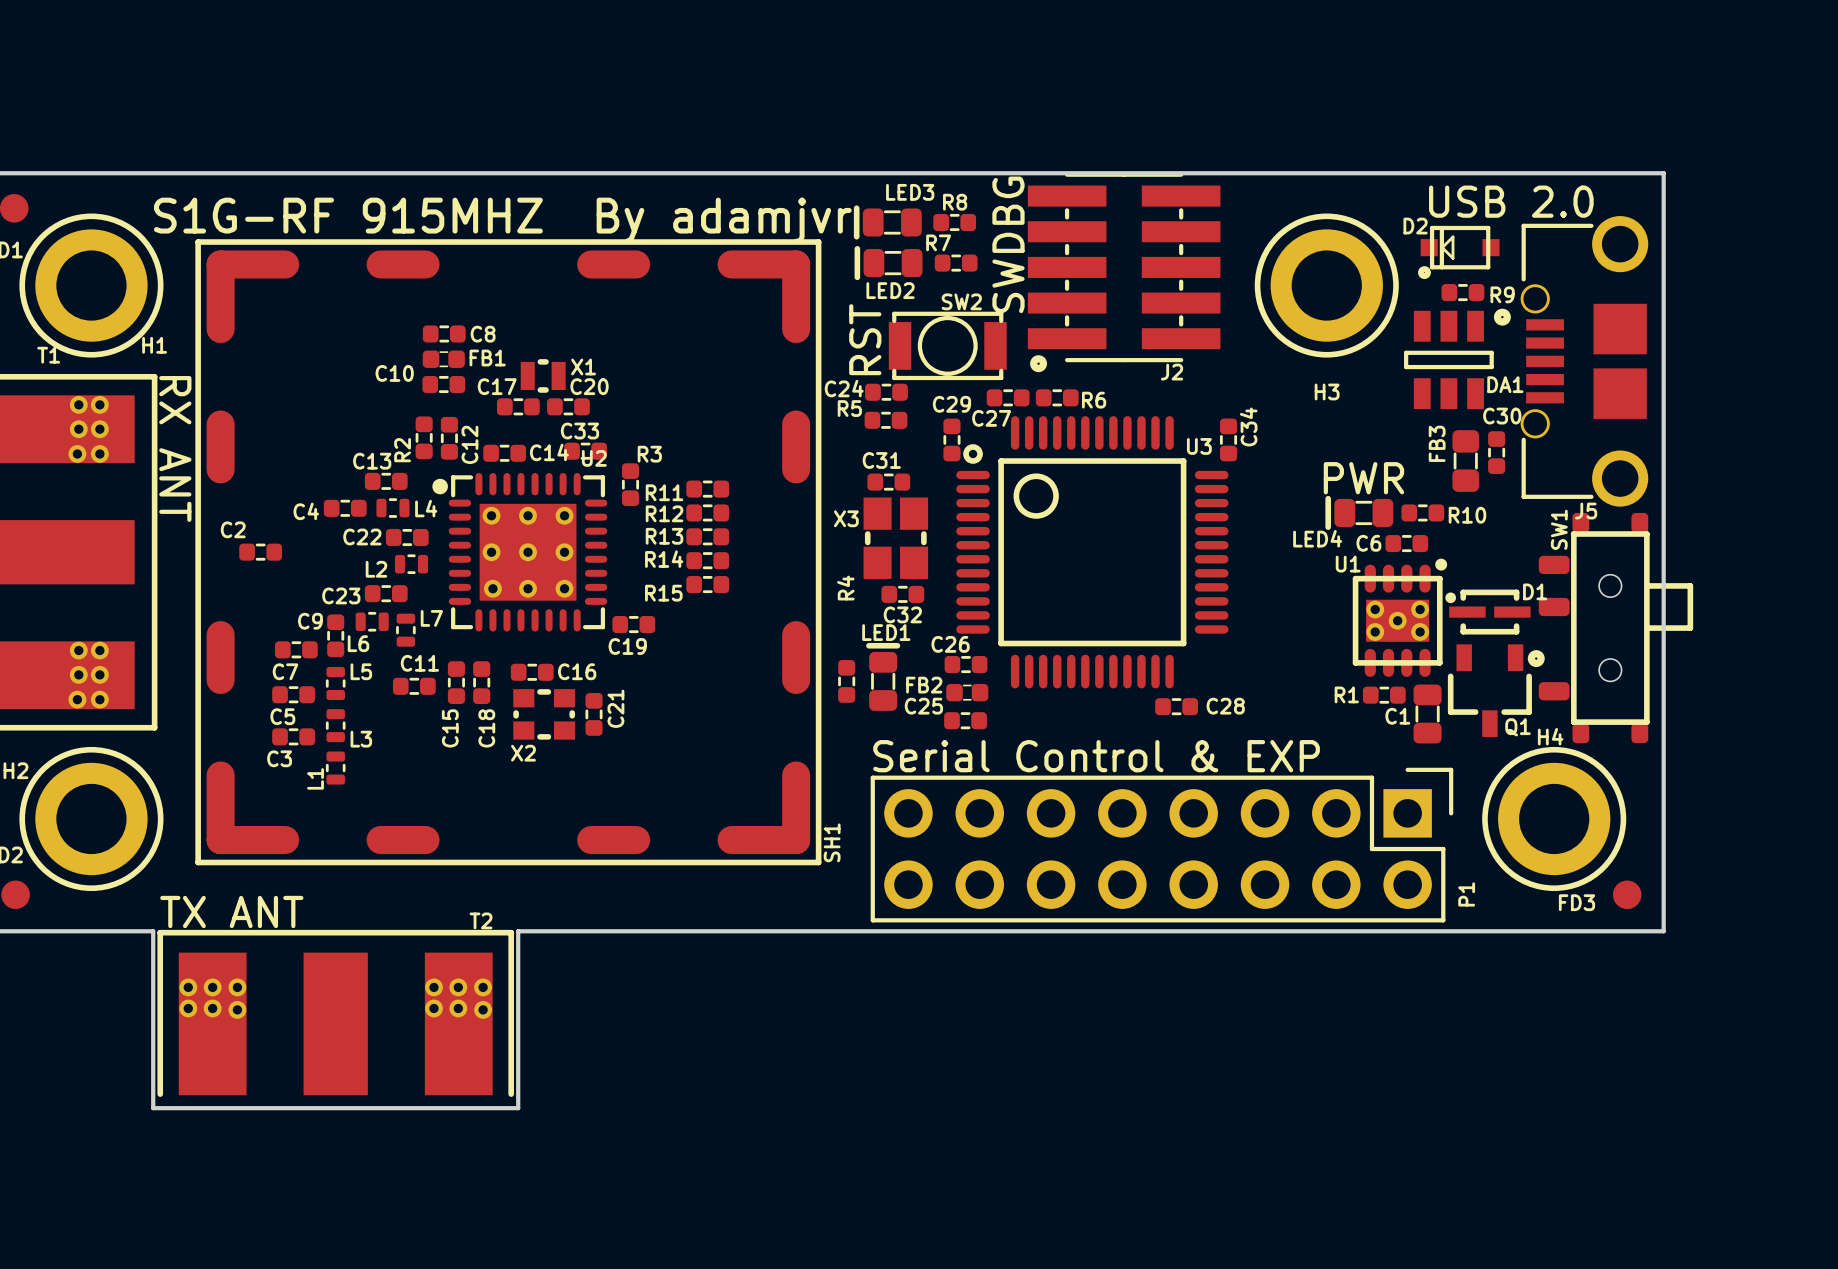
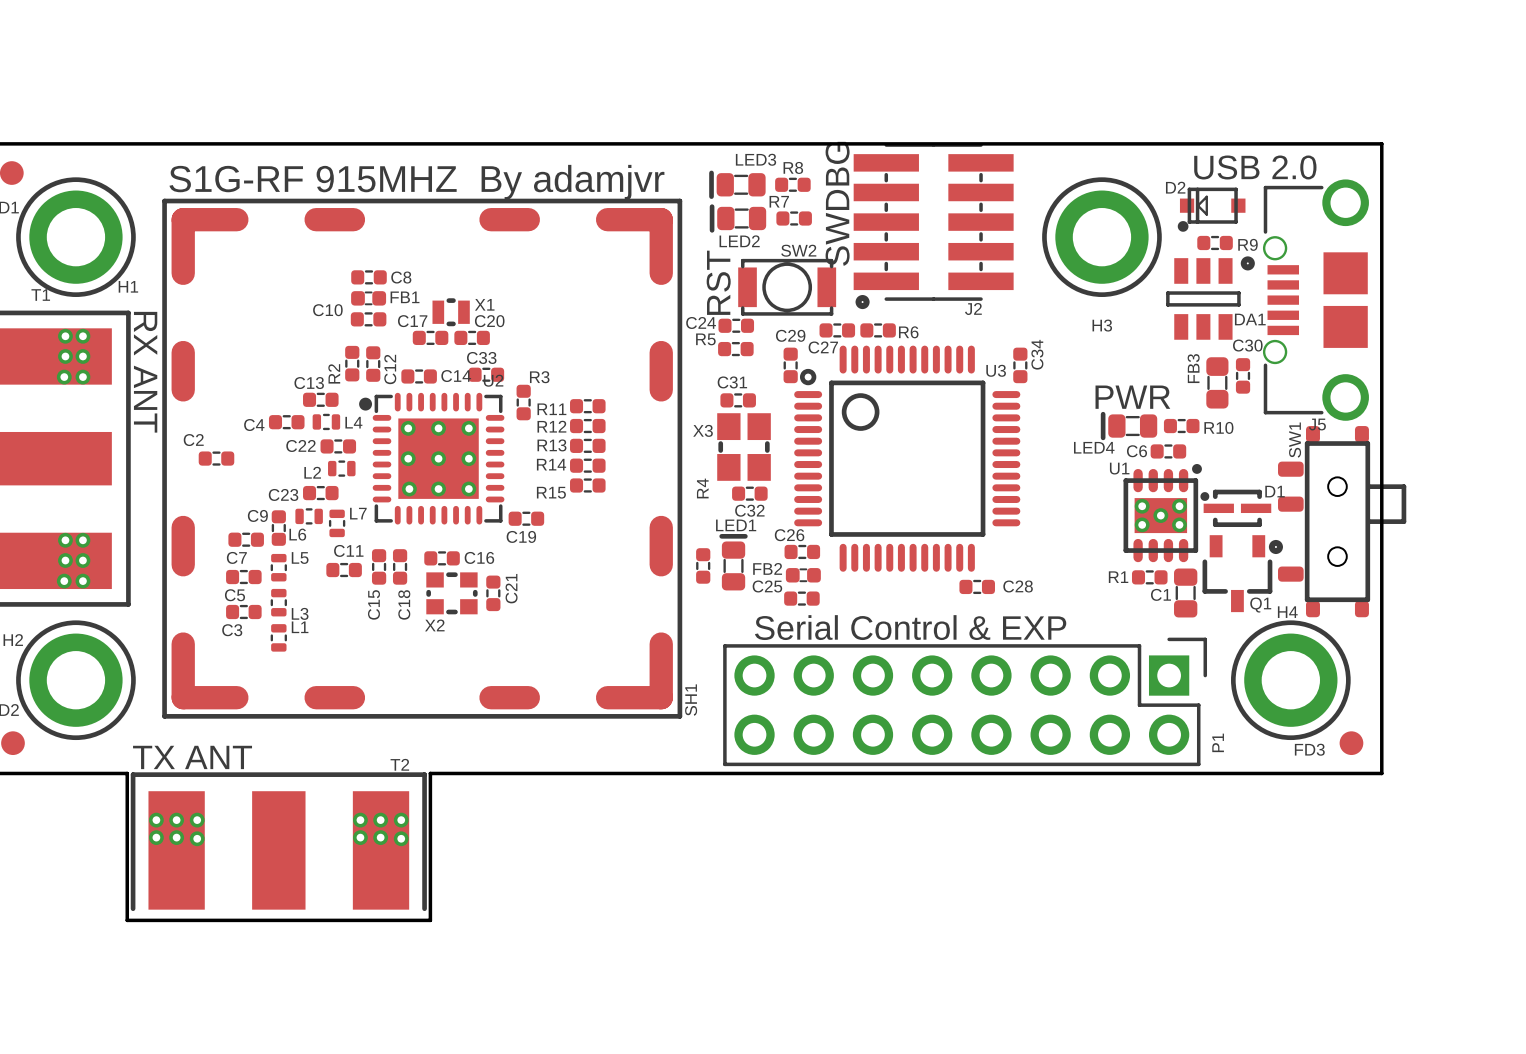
L1 name rotation: 0° (315, 778) -> 90° clockwise (300, 627)
L1 name position: L1 (315, 778) -> L1 (300, 627)

